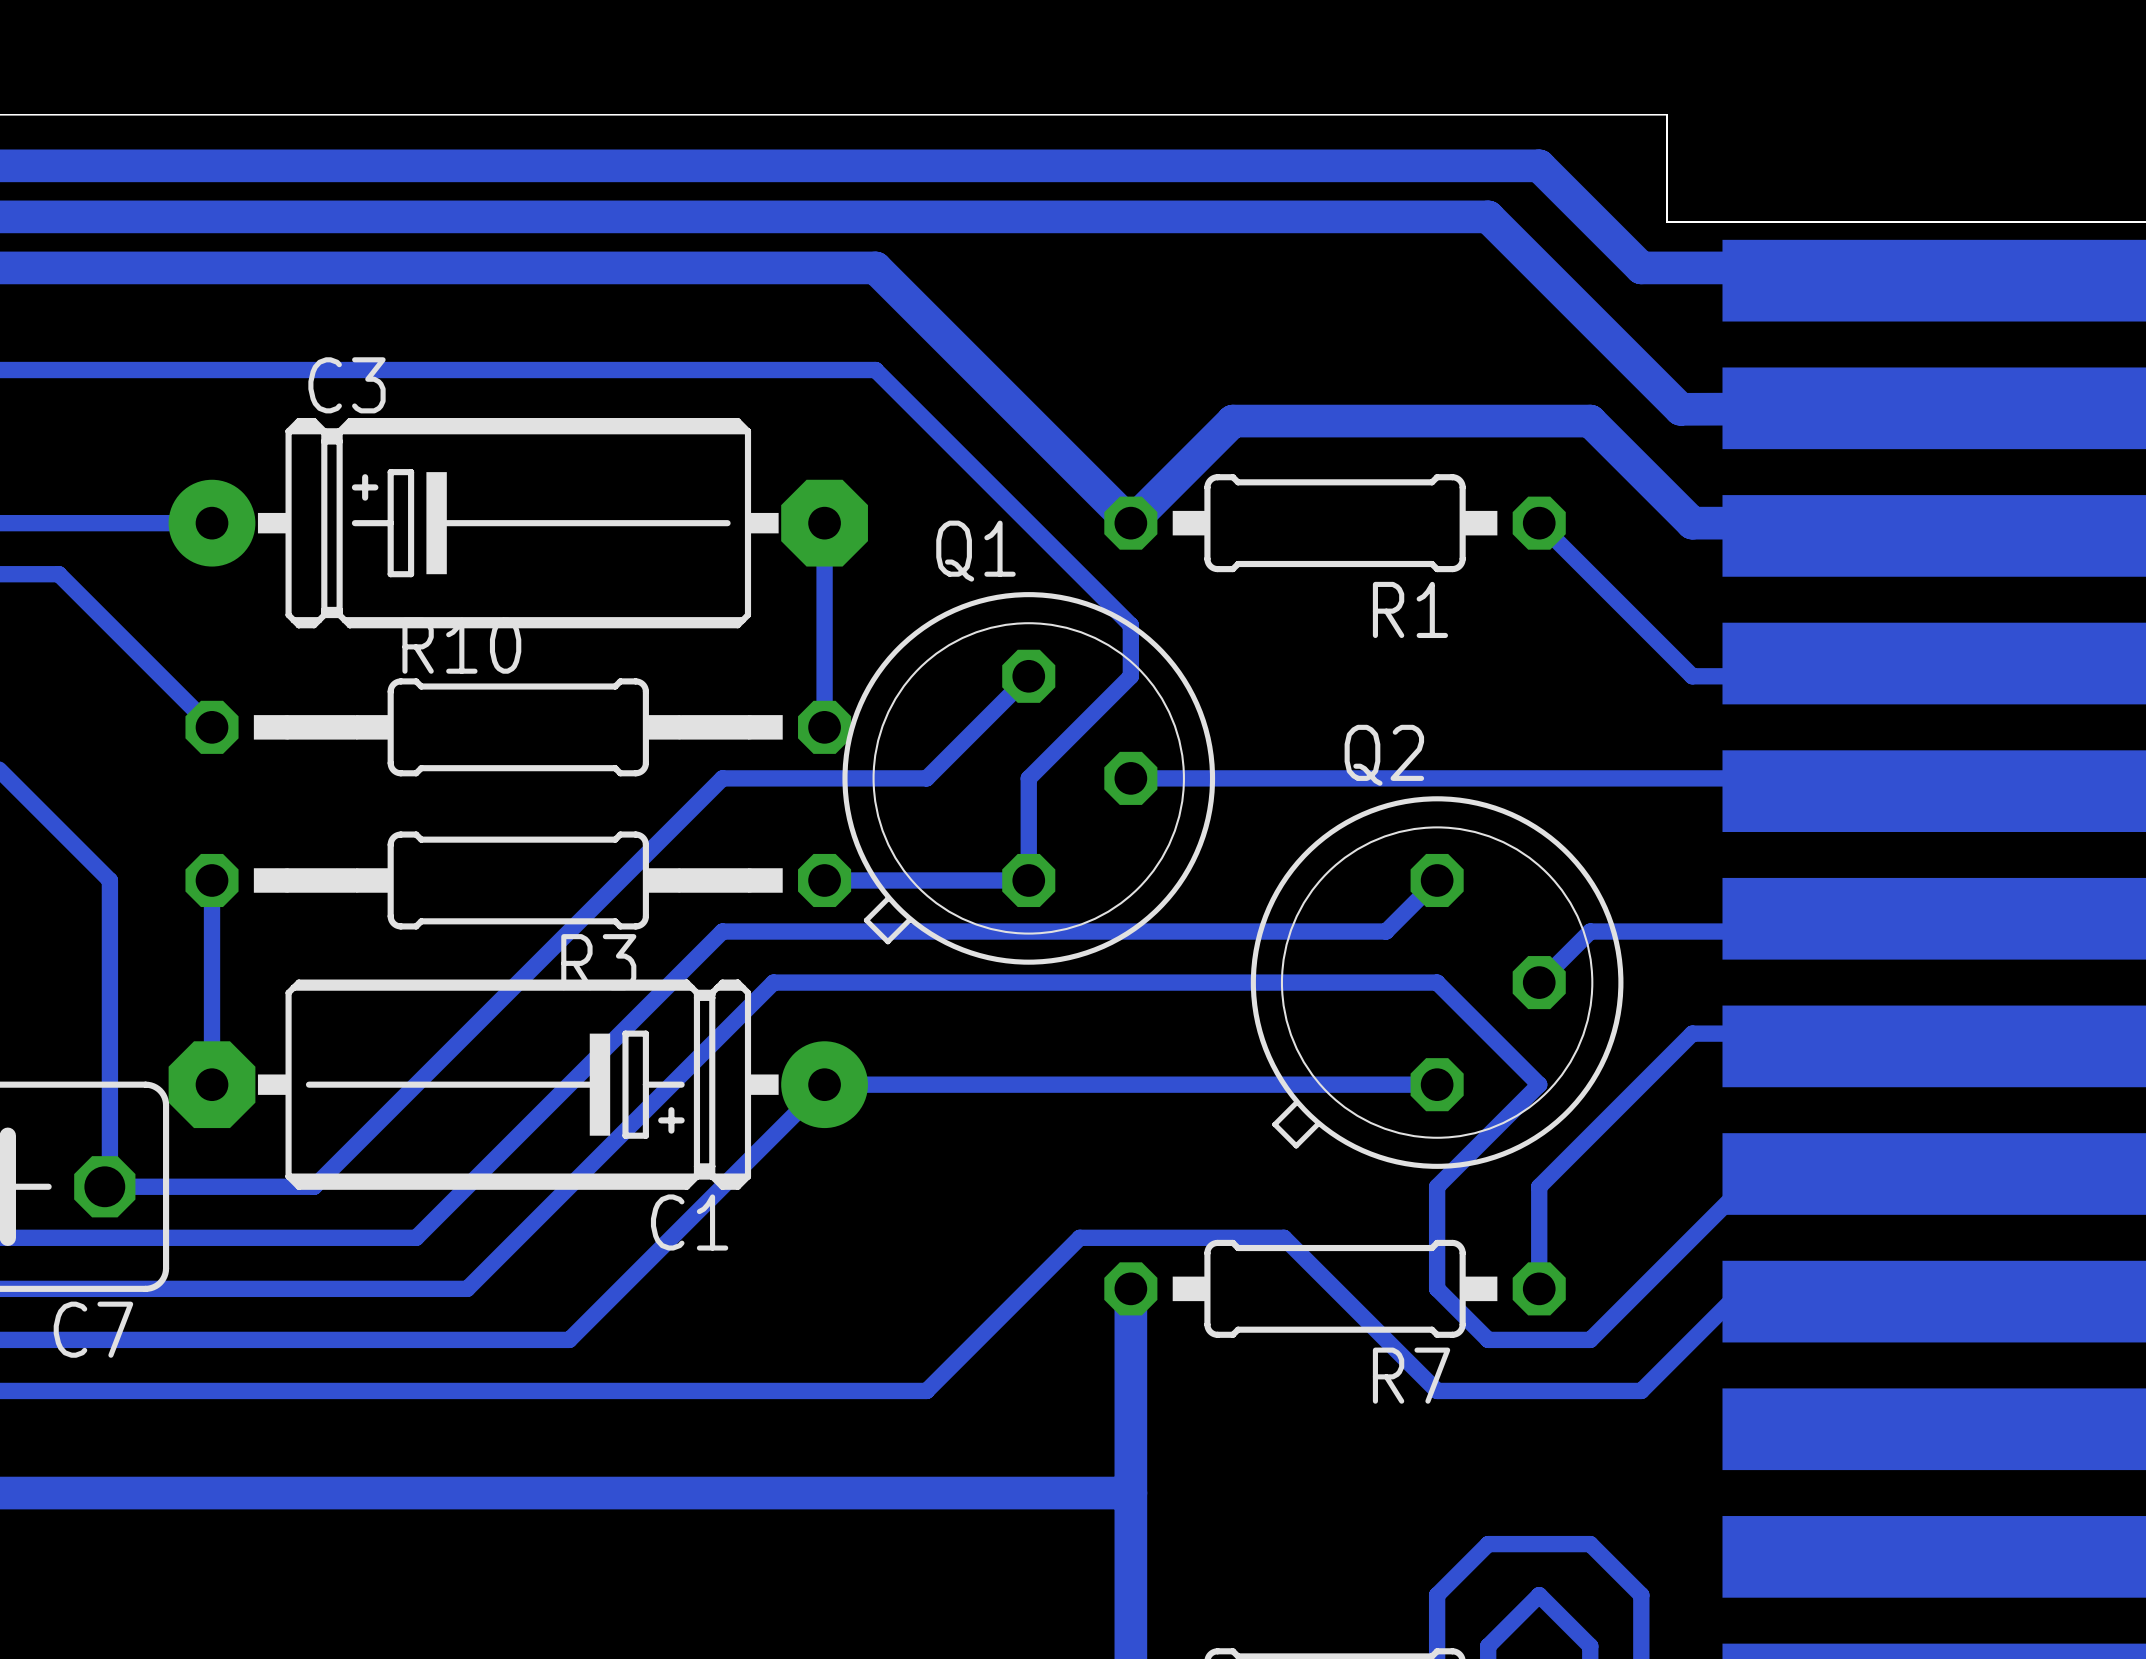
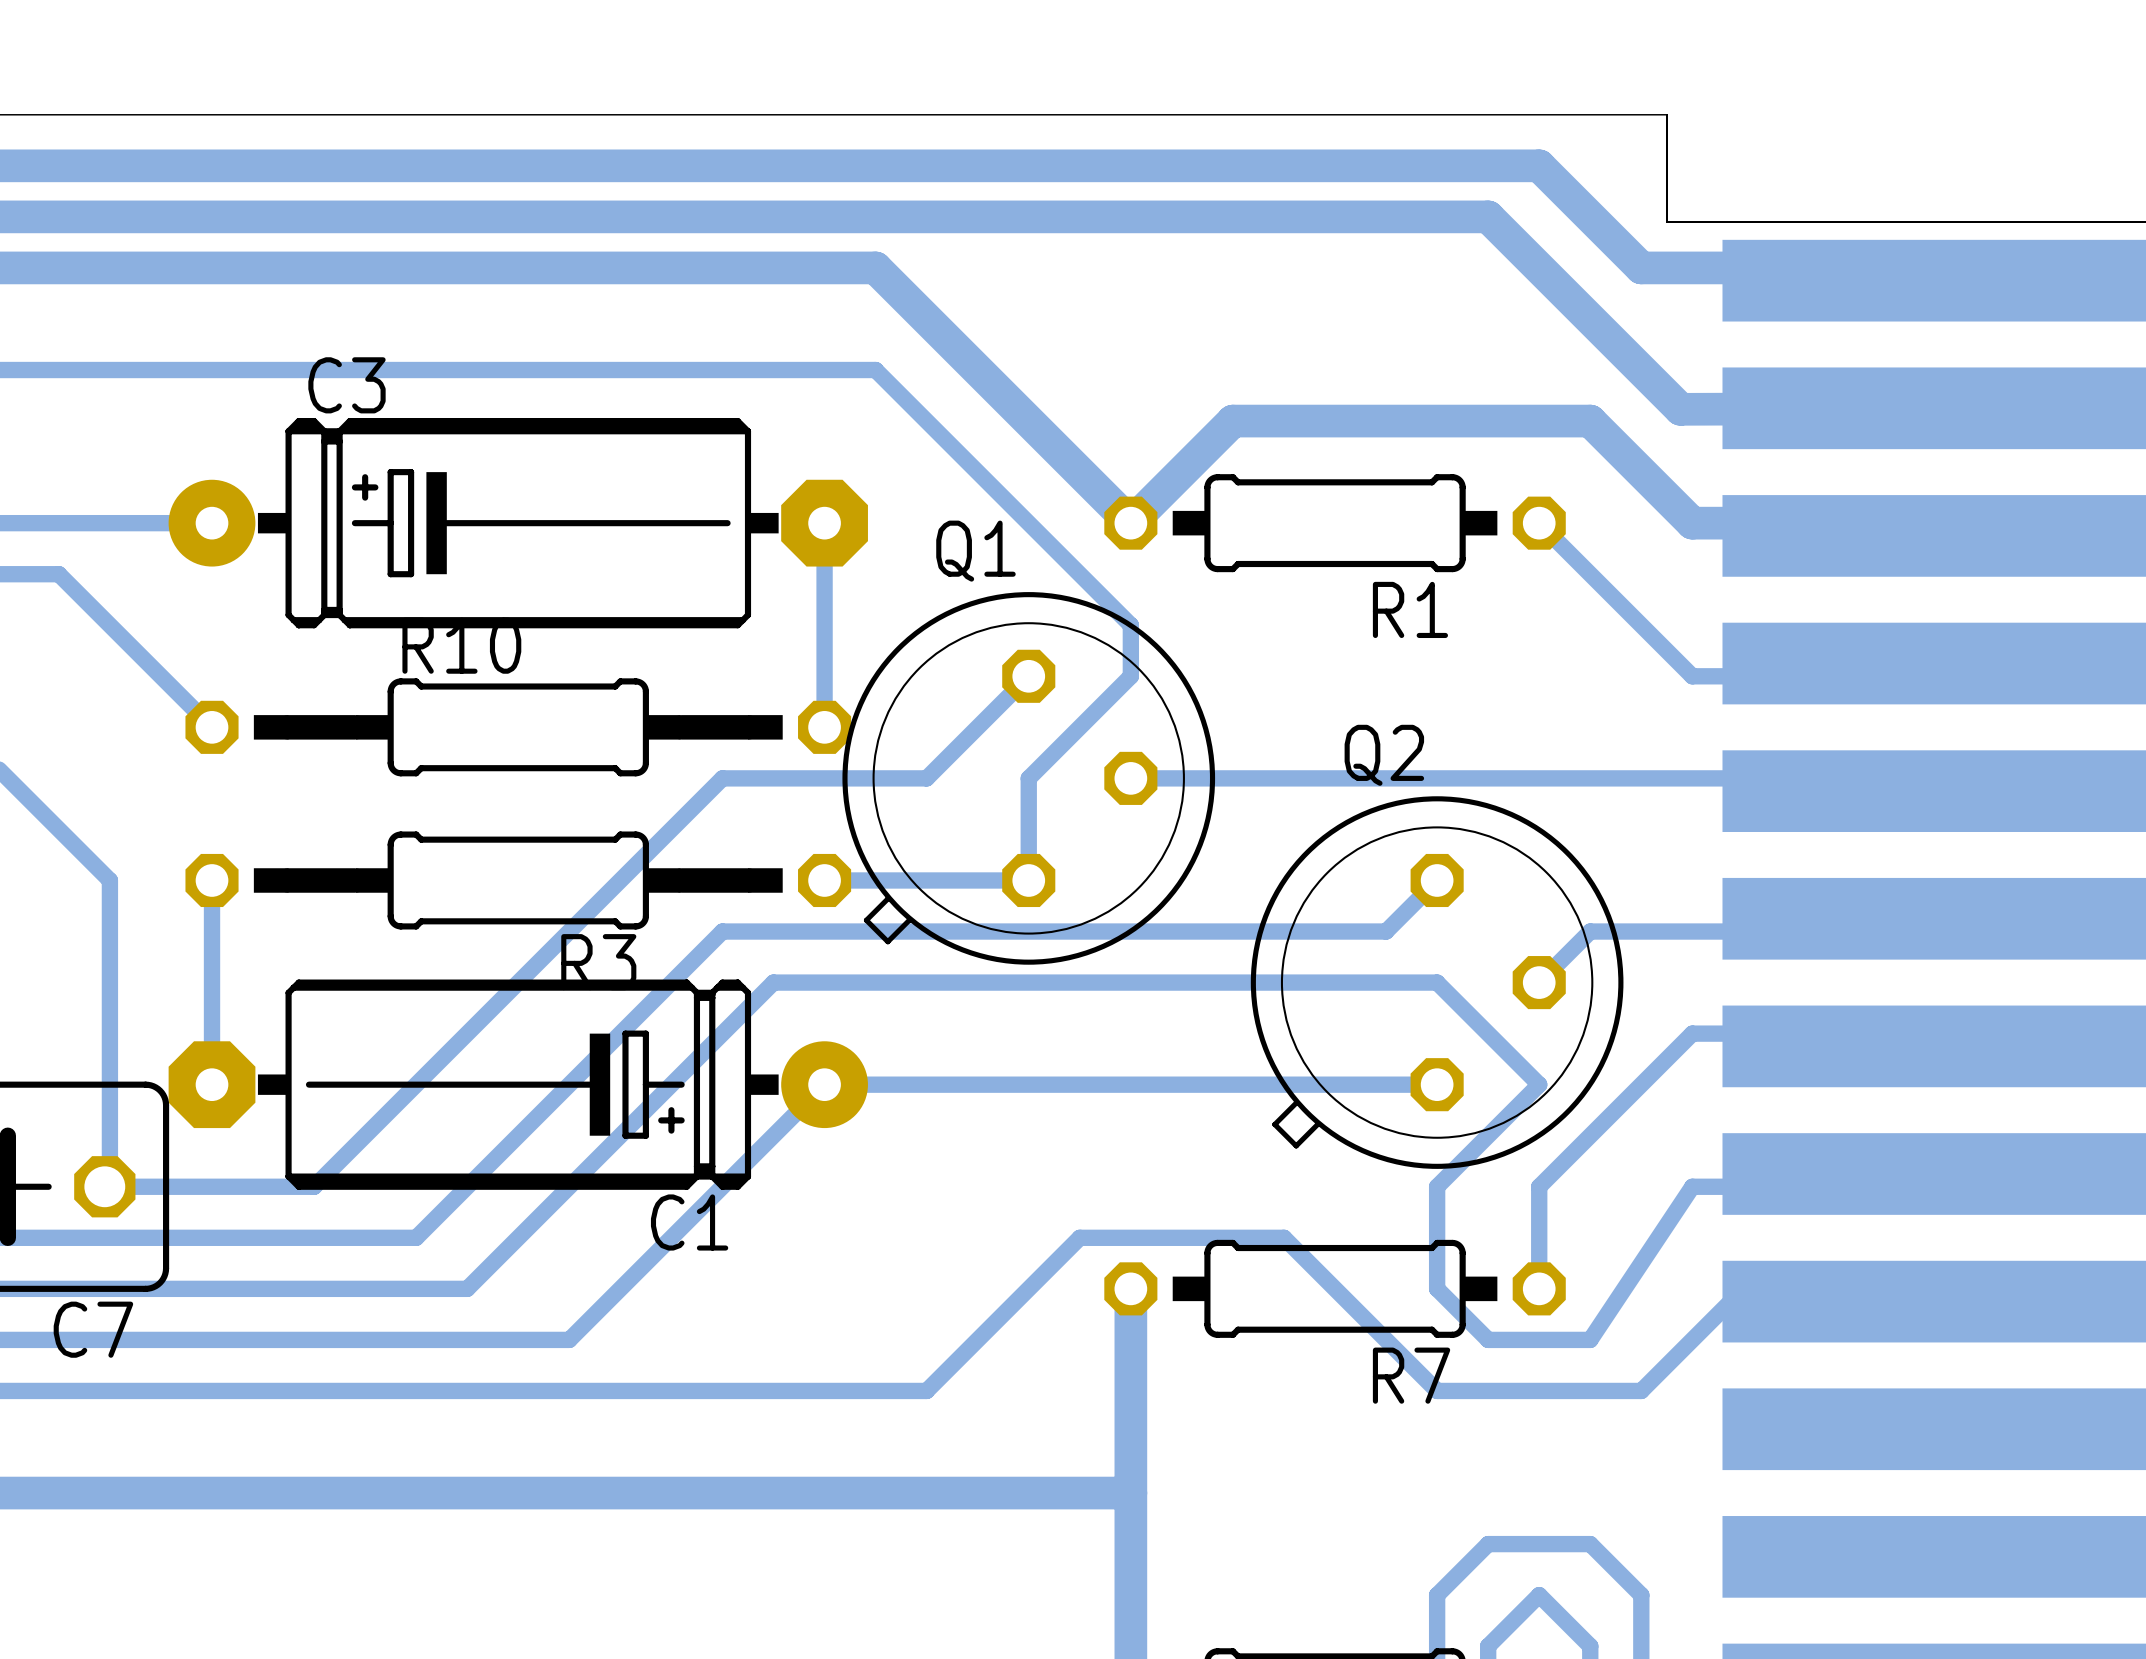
bottom track: (1743, 1186) (1590, 1339) -> (1743, 1186) (1692, 1186) (1590, 1339)

